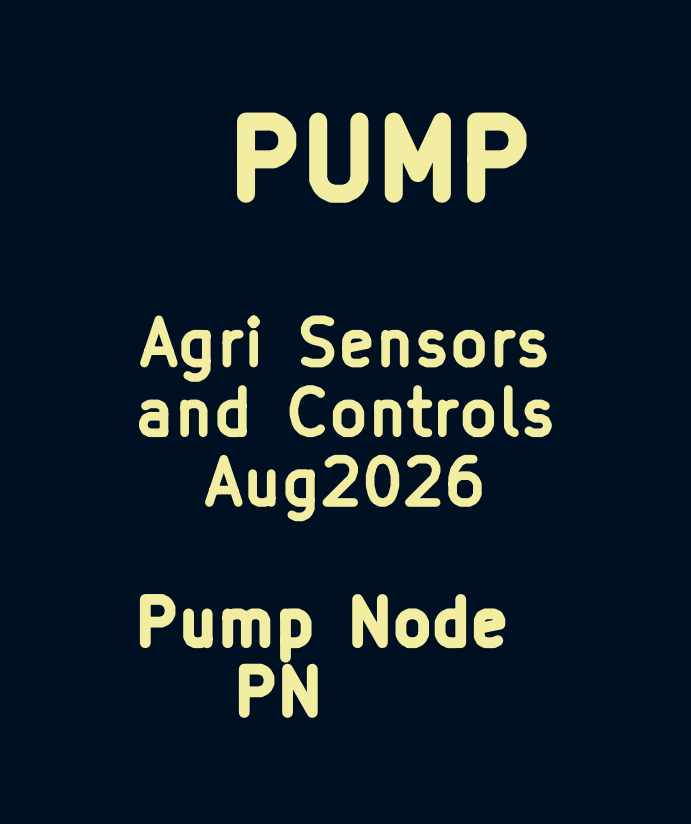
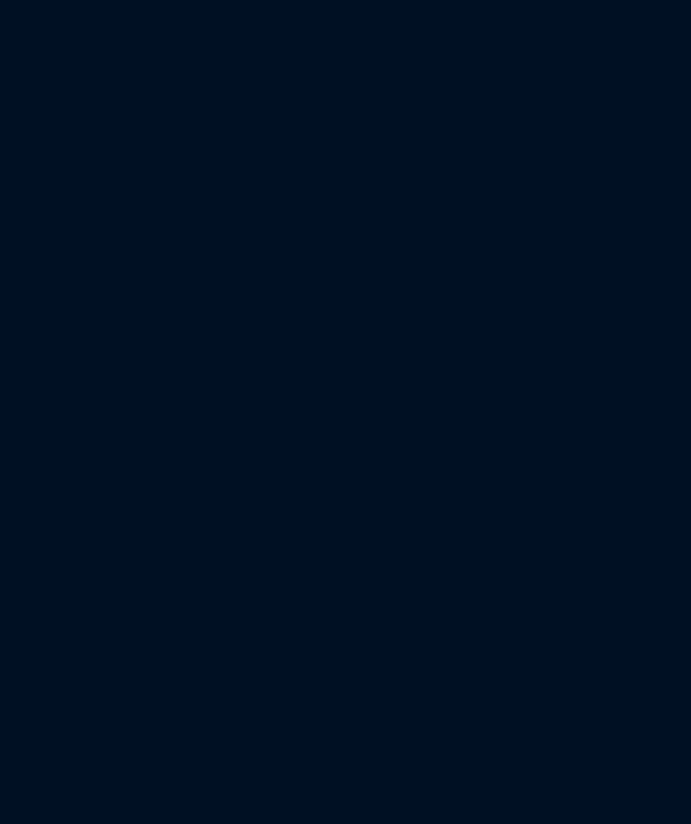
text: PUMP (381, 157) -> none
text: Agri Sensors (343, 348) -> none
text: and Controls (345, 411) -> none
text: Aug2026 (343, 488) -> none
text: Pump Node (322, 628) -> none
text: PN (278, 690) -> none

